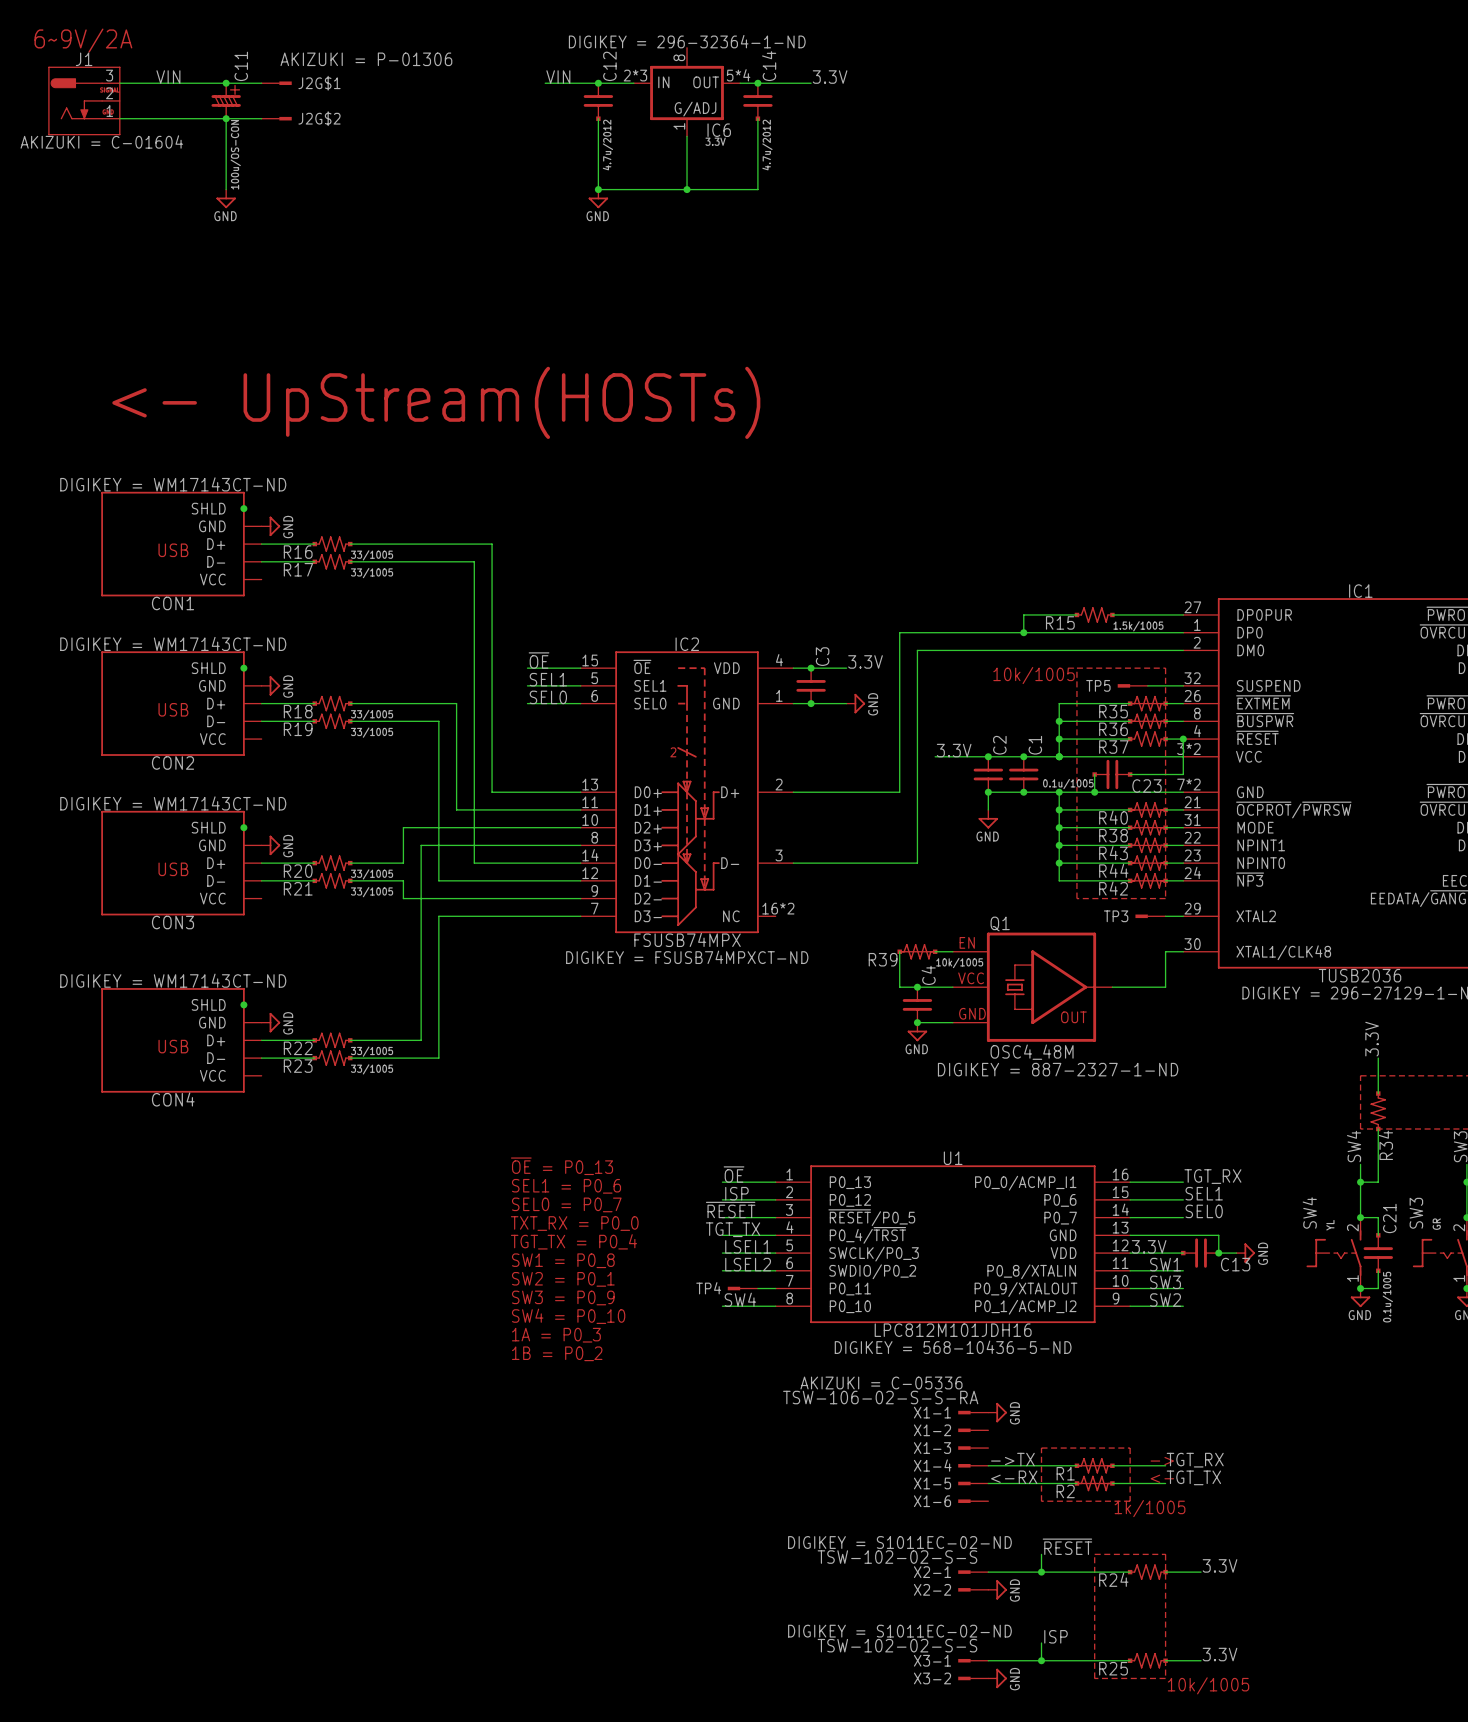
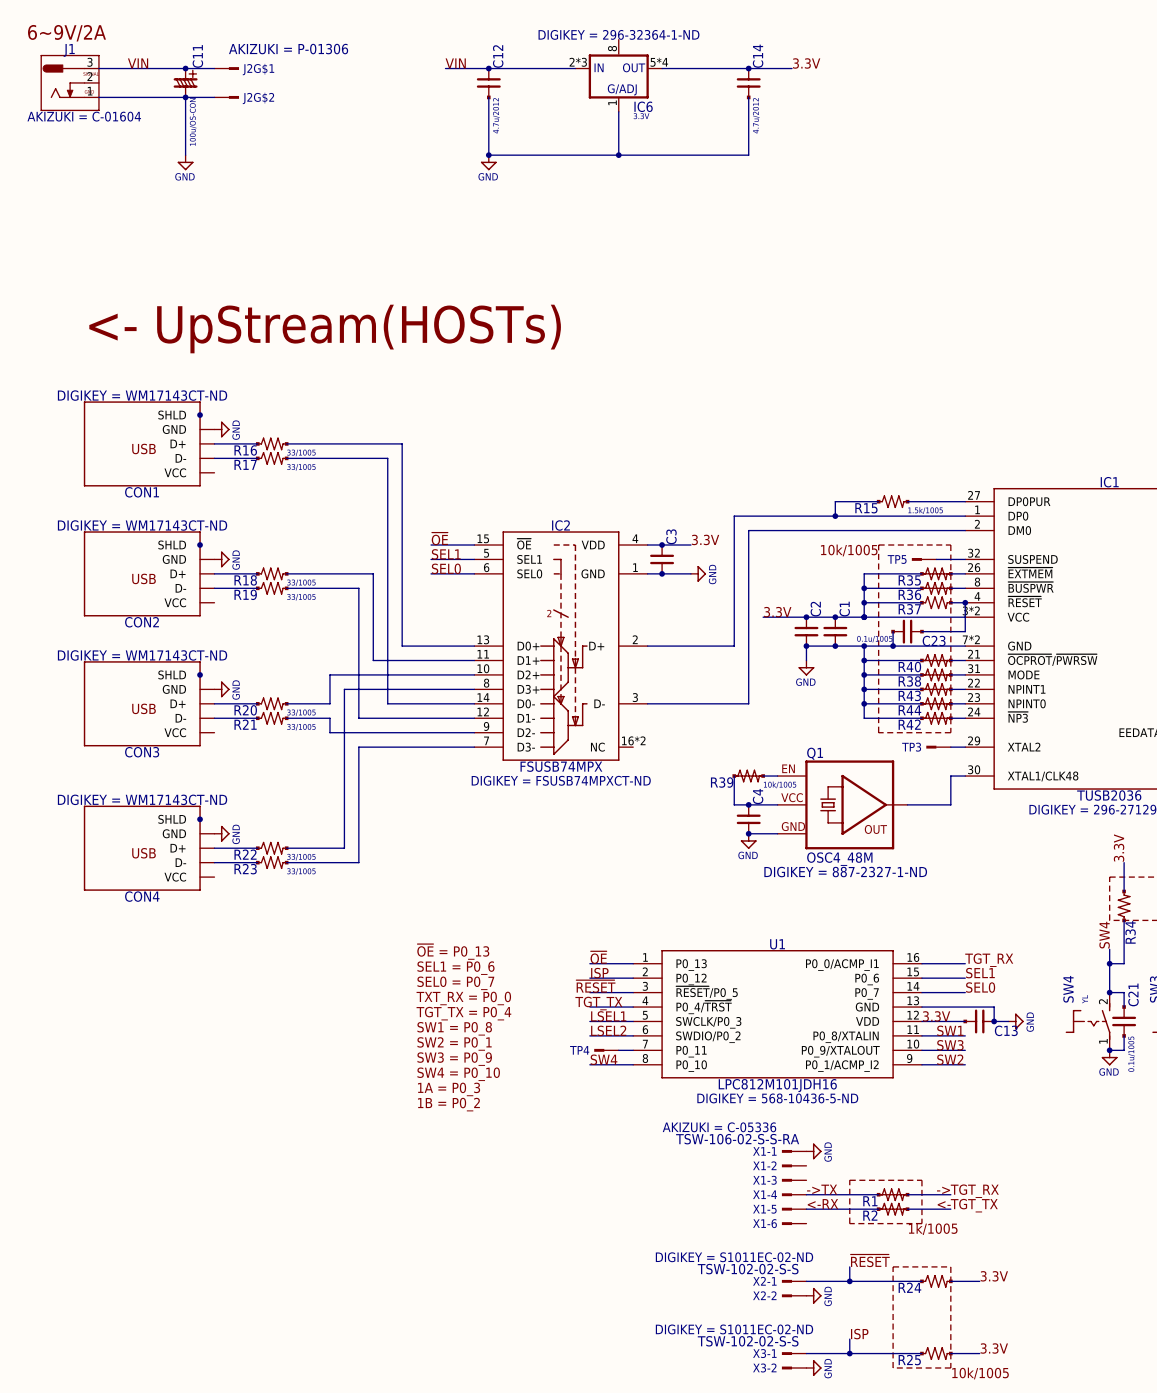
label position: 3.3V (830, 77) -> 3.3V (806, 63)
wire: none -> (517, 68) (575, 68)
wire: (740, 83) (811, 83) -> (792, 68) (662, 68)
junction: (757, 83) -> none
junction: none -> (748, 68)
IC6 position: (687, 92) -> (618, 75)
C14 position: (757, 100) -> (748, 82)
wire: none -> (748, 97) (748, 155) (618, 155)
wire: (687, 136) (687, 189) -> none
junction: (687, 189) -> none
junction: none -> (618, 155)

